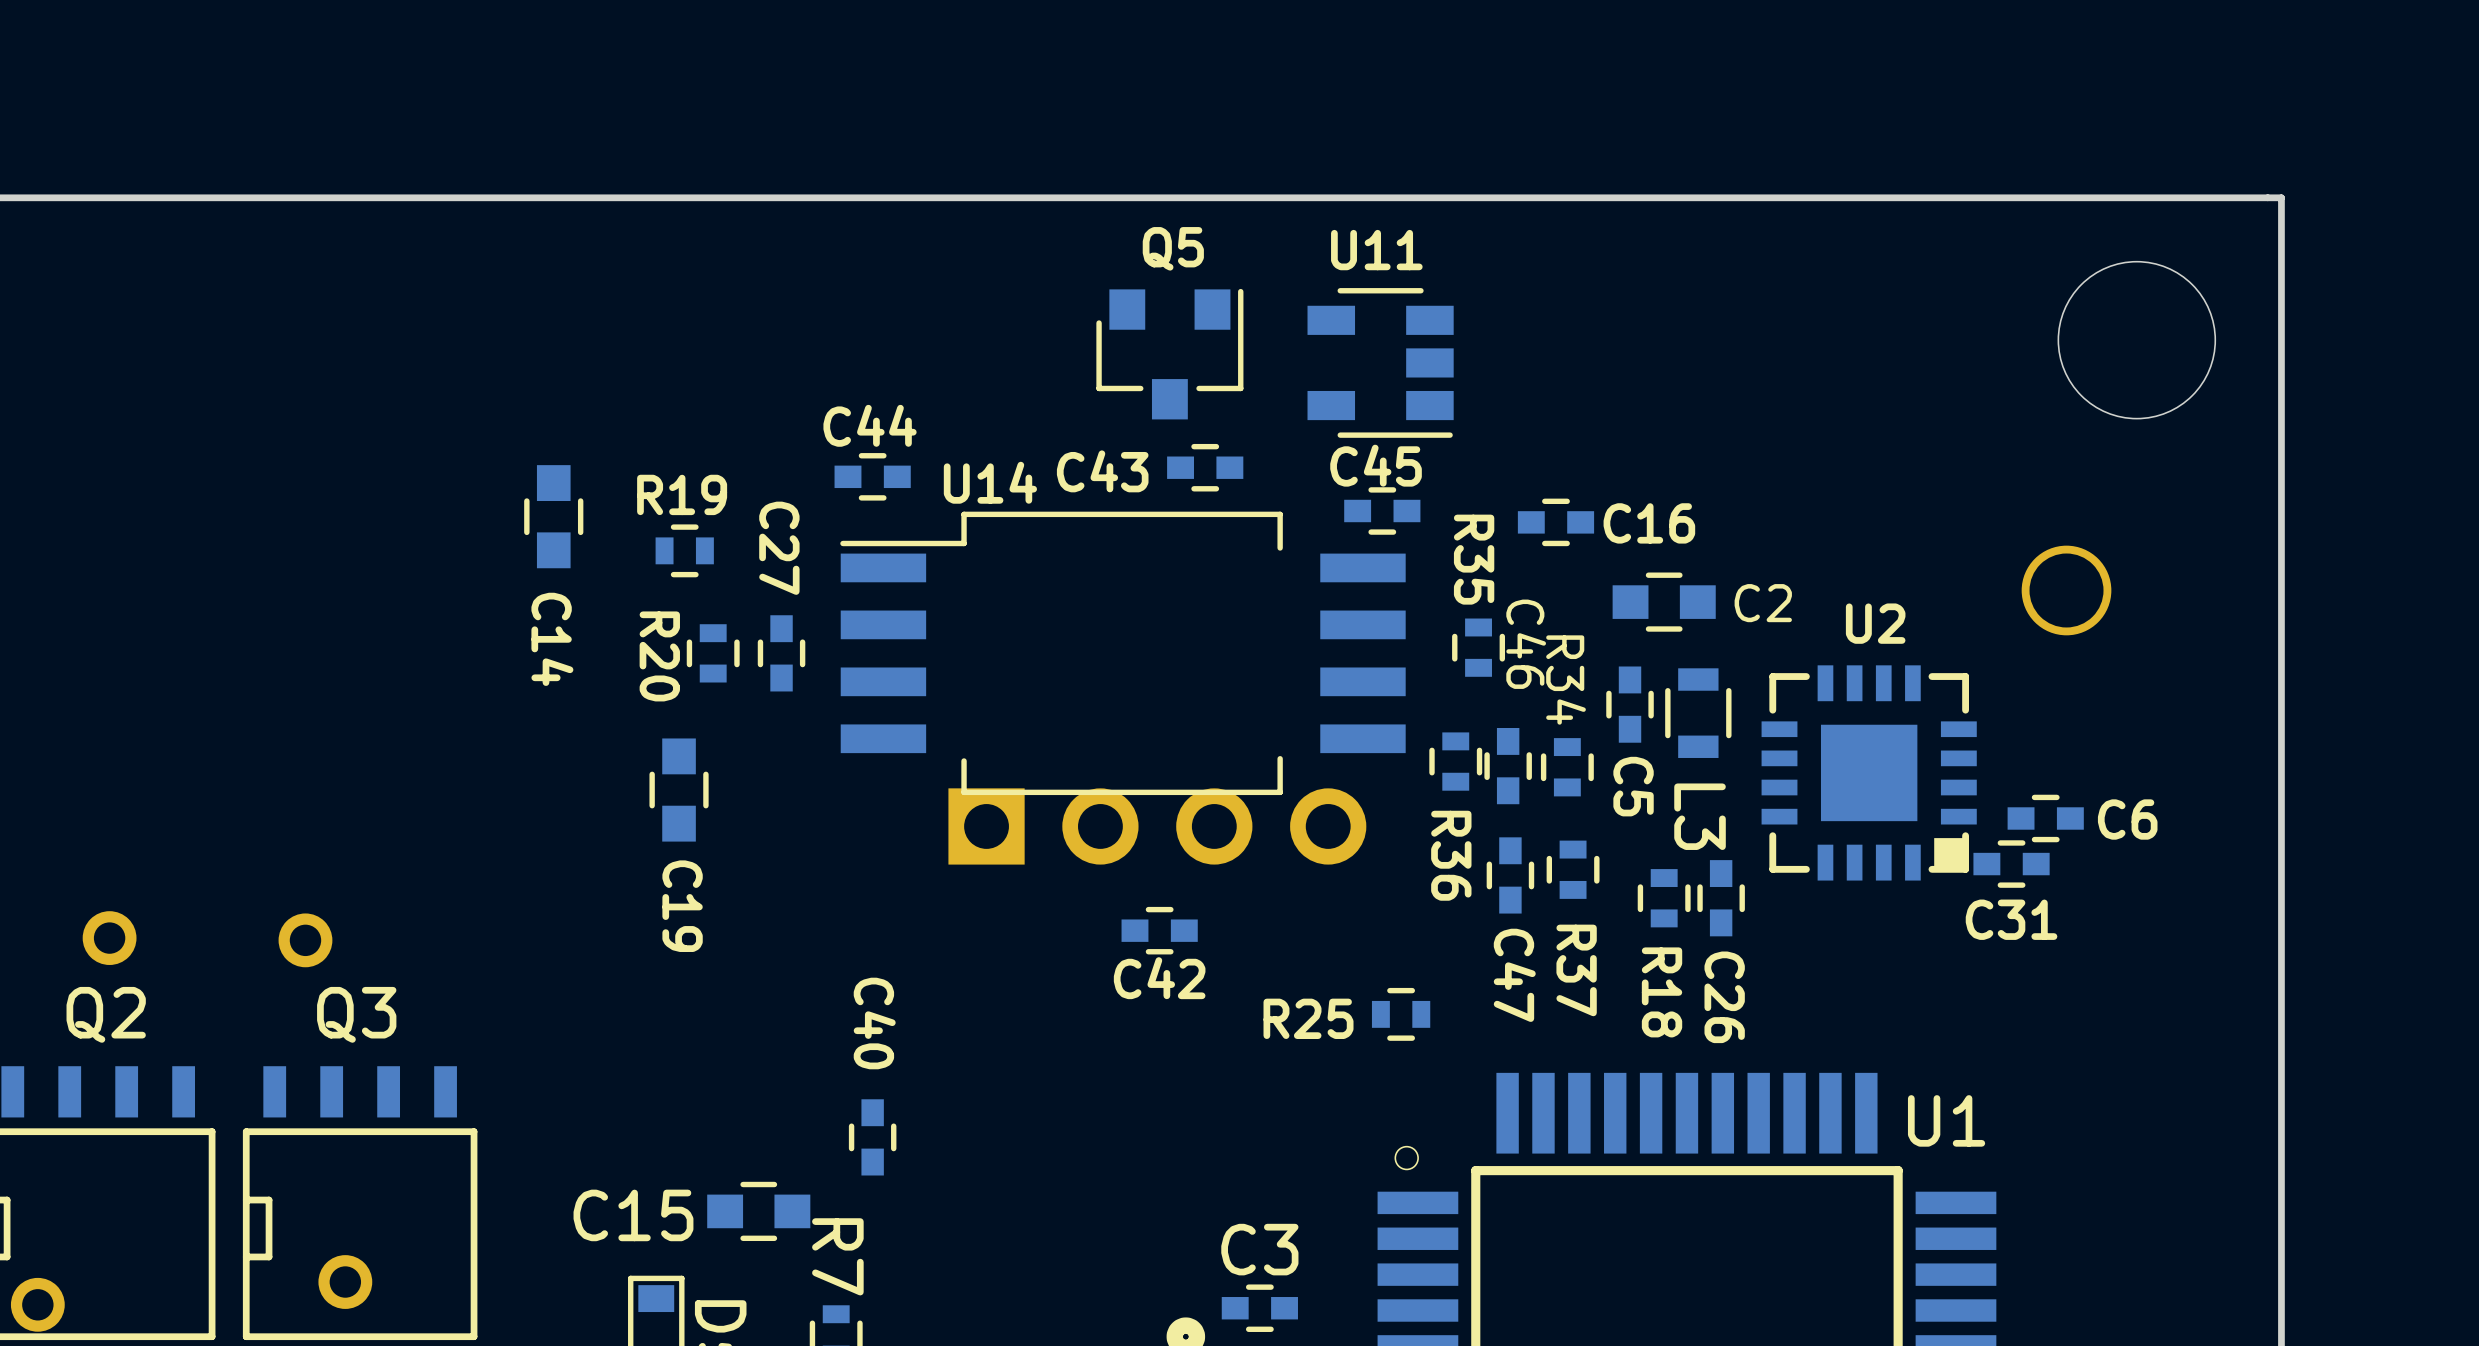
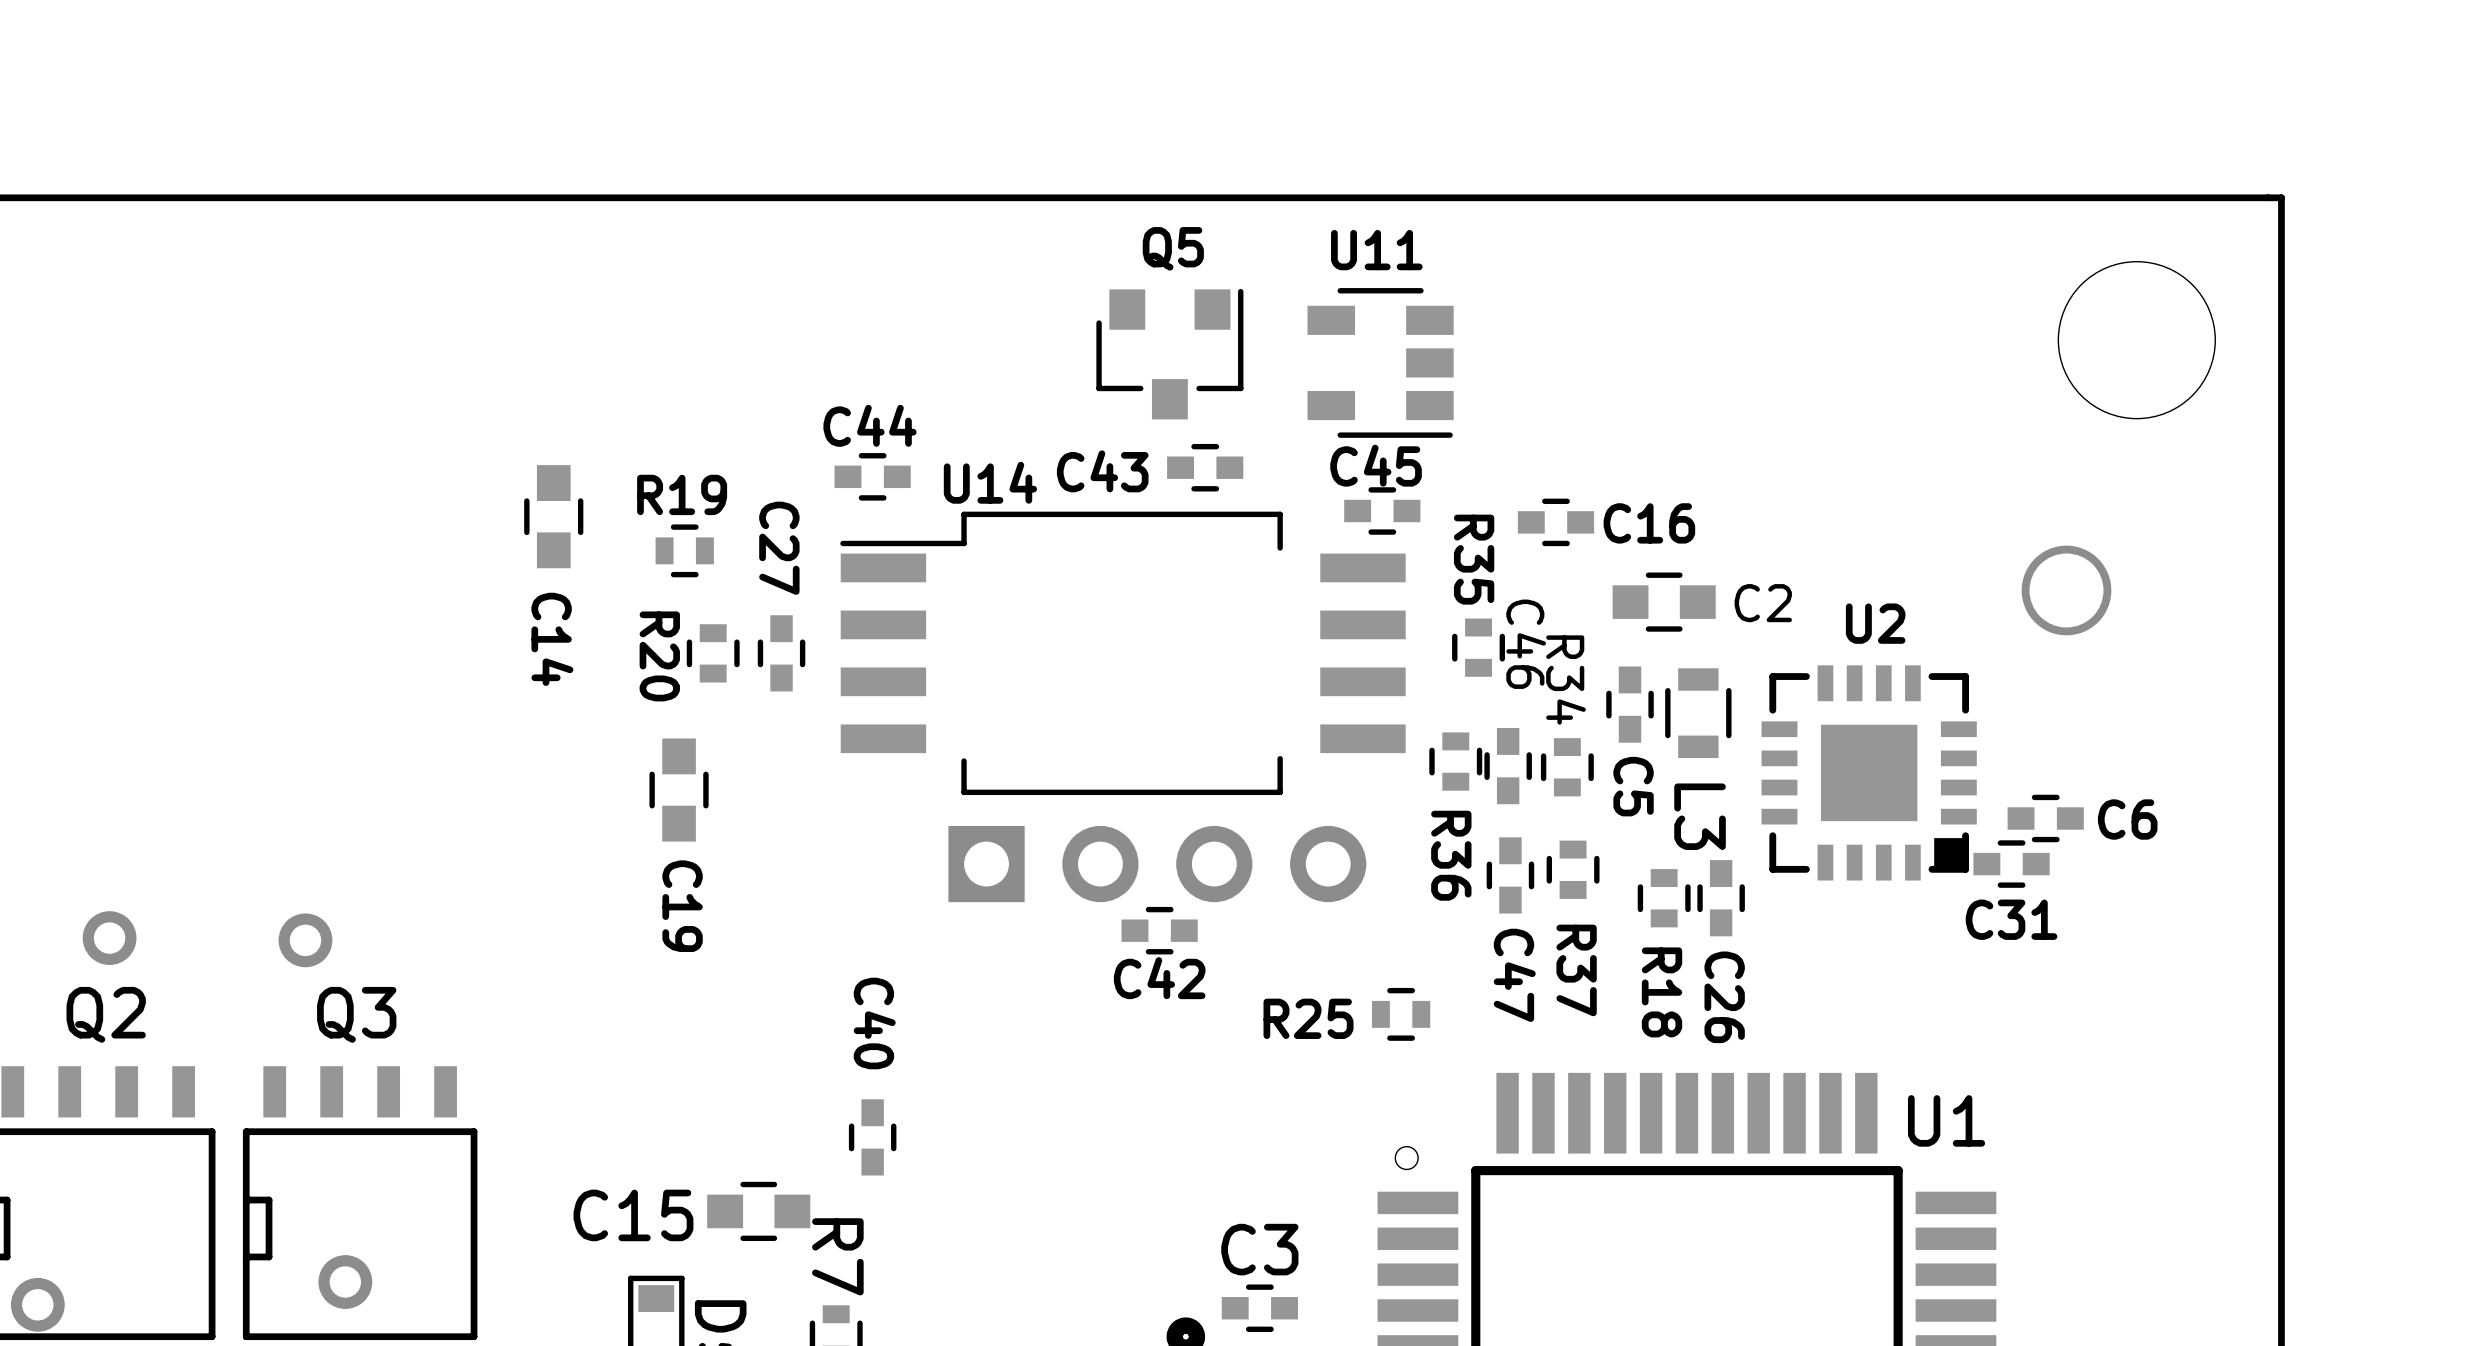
part position: (1157, 826) -> (1157, 864)

